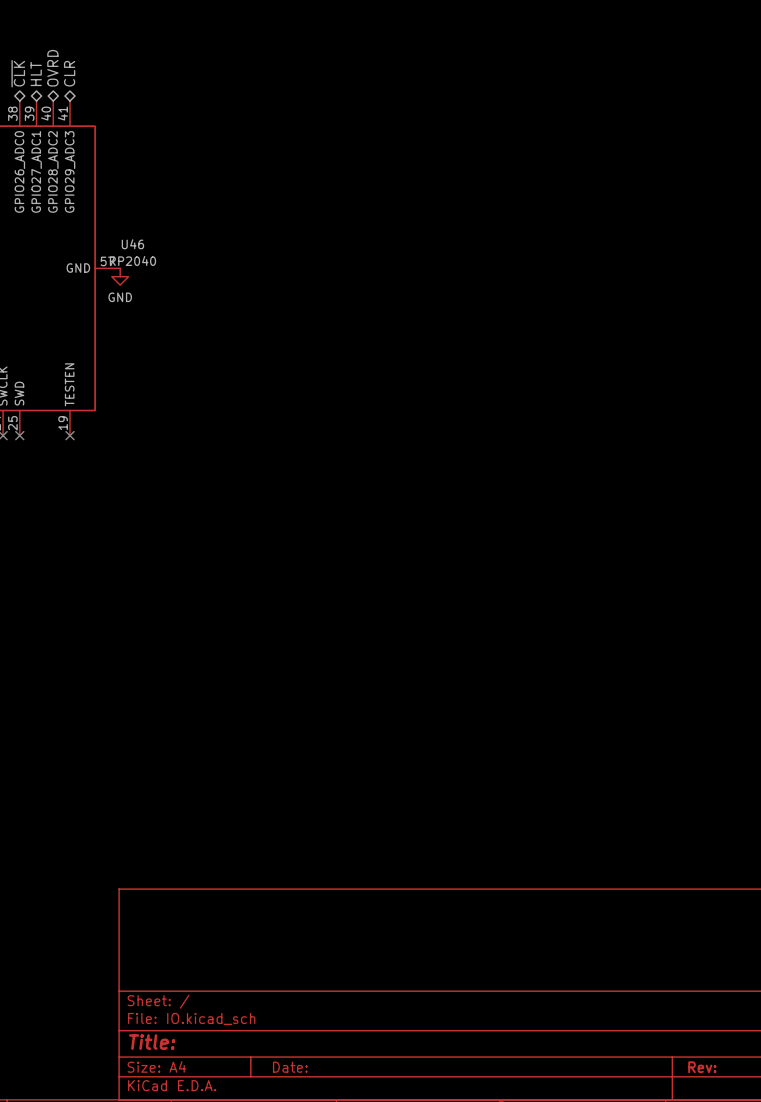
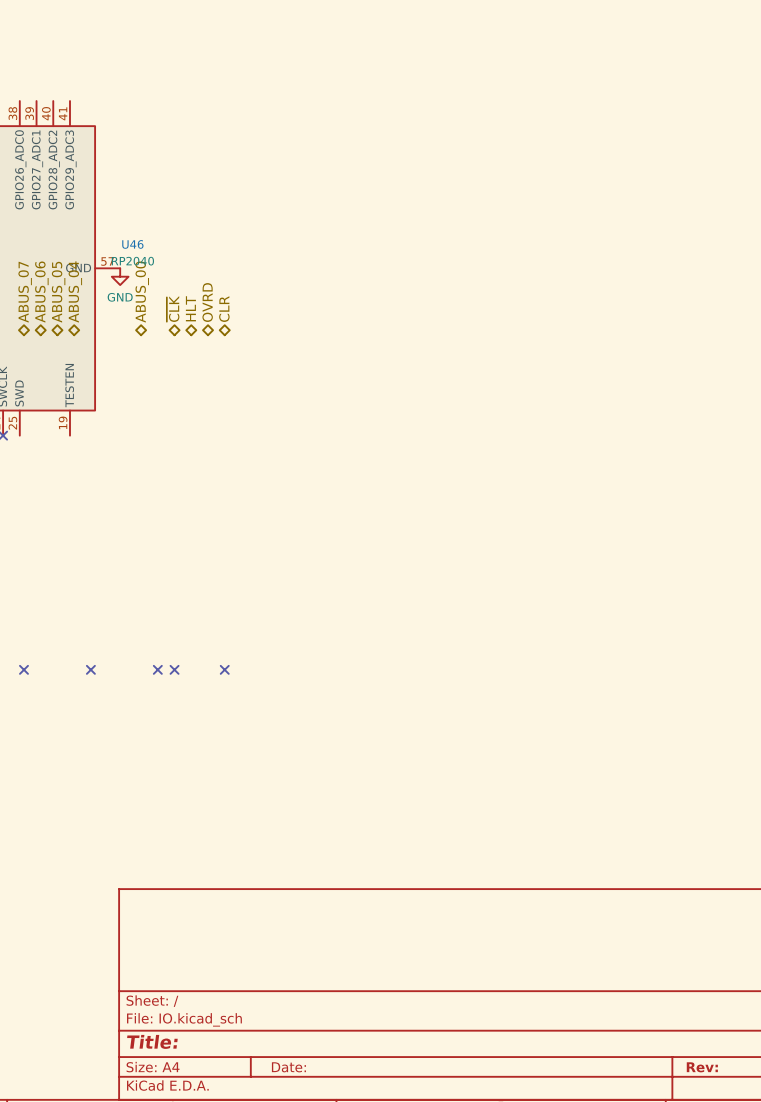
hierarchical label: OVRD (52, 68) -> none
hierarchical label: ~{CLK} (18, 73) -> none
hierarchical label: HLT (36, 73) -> none
hierarchical label: CLR (69, 73) -> none
hierarchical label: none -> ABUS_07 (25, 292)
hierarchical label: none -> ABUS_06 (41, 292)
hierarchical label: none -> ABUS_05 (58, 292)
hierarchical label: none -> ABUS_04 (75, 292)
hierarchical label: none -> ABUS_00 (142, 292)
hierarchical label: none -> OVRD (207, 302)
hierarchical label: none -> ~{CLK} (173, 309)
hierarchical label: none -> CLR (224, 309)
hierarchical label: none -> HLT (190, 308)
no-connect mark: (19, 435) -> none
no-connect mark: (69, 435) -> none
no-connect mark: none -> (23, 669)
no-connect mark: none -> (90, 669)
no-connect mark: none -> (157, 669)
no-connect mark: none -> (174, 669)
no-connect mark: none -> (224, 669)

